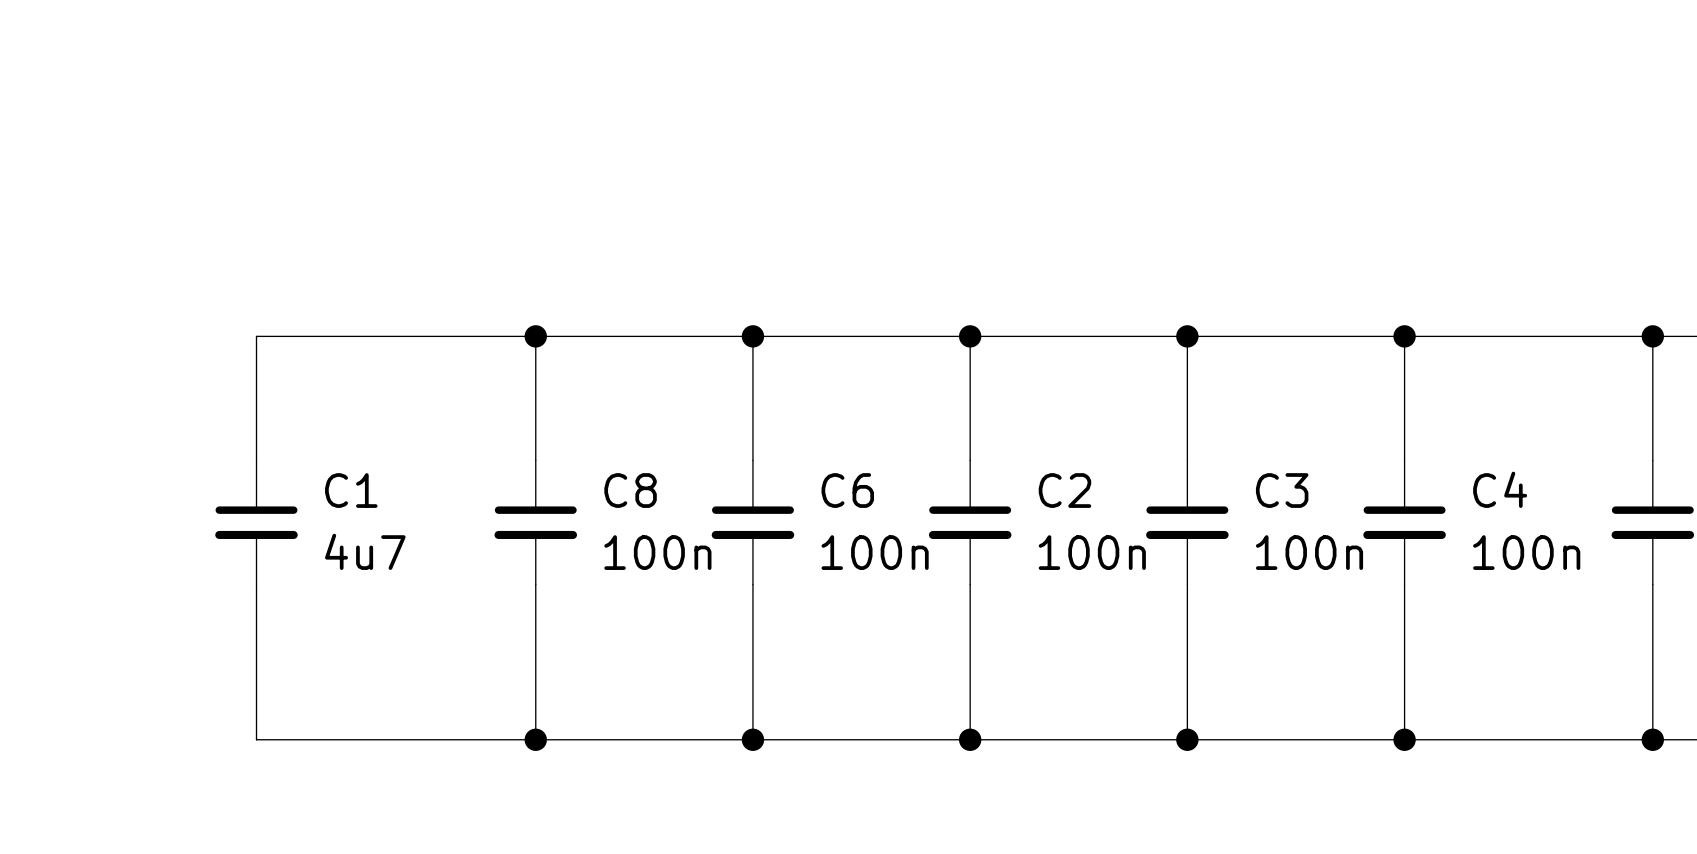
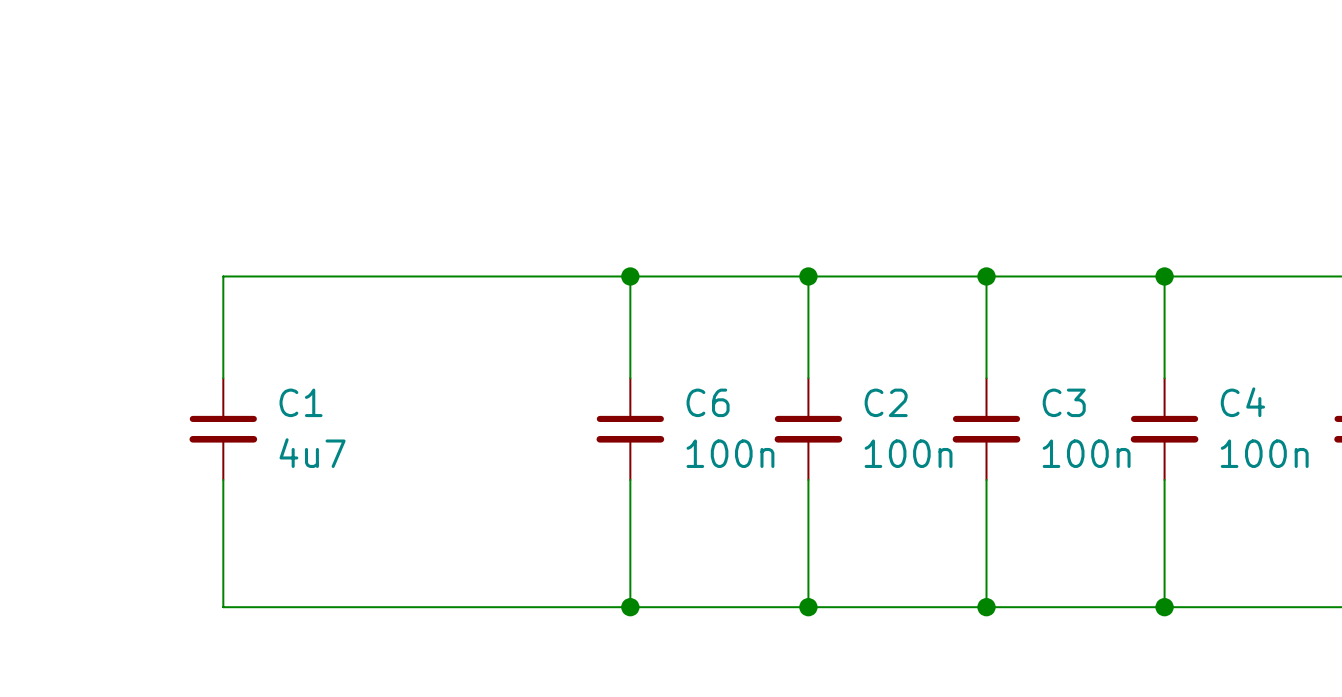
wire: (535, 336) (535, 460) -> none
junction: (535, 336) -> none
C8: 100n (535, 522) -> none
wire: (535, 584) (535, 739) -> none
junction: (535, 739) -> none

